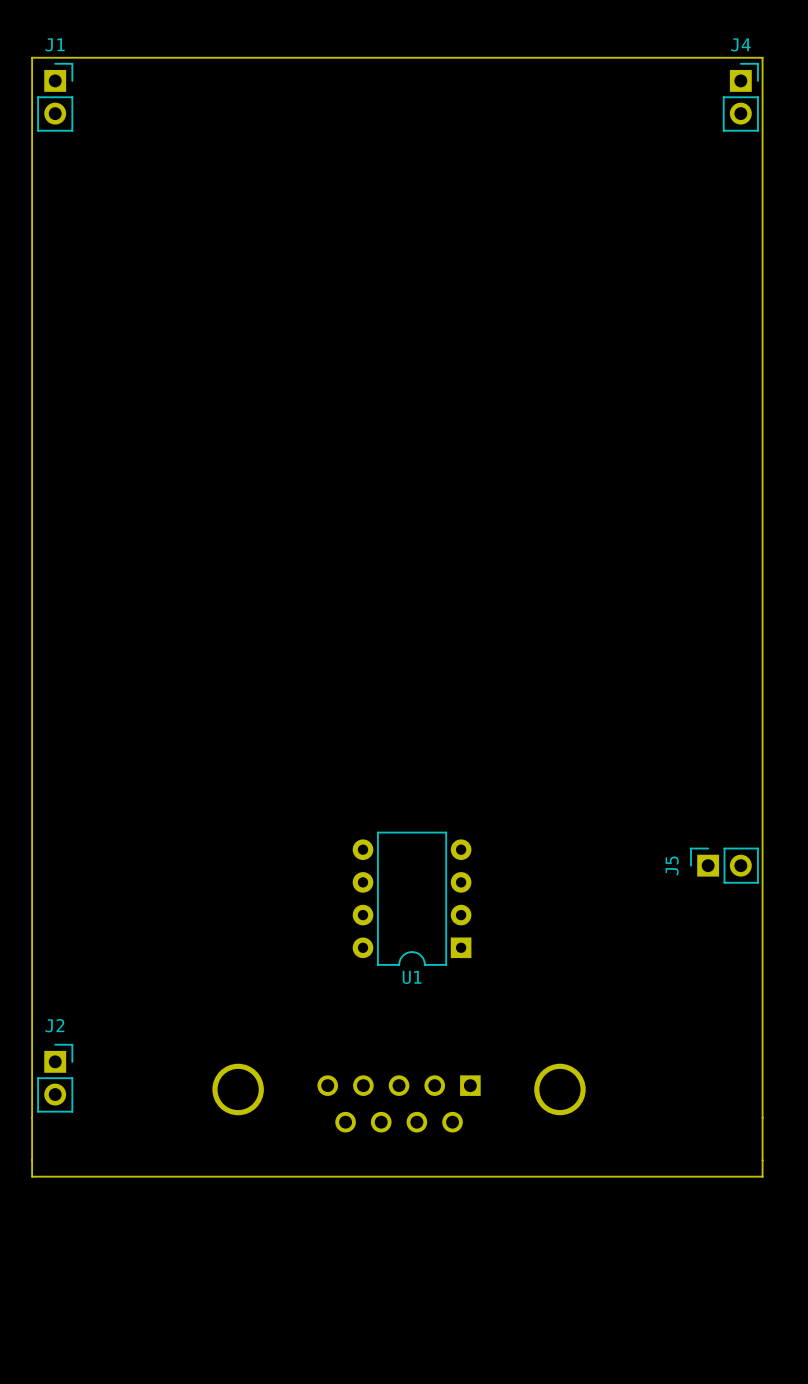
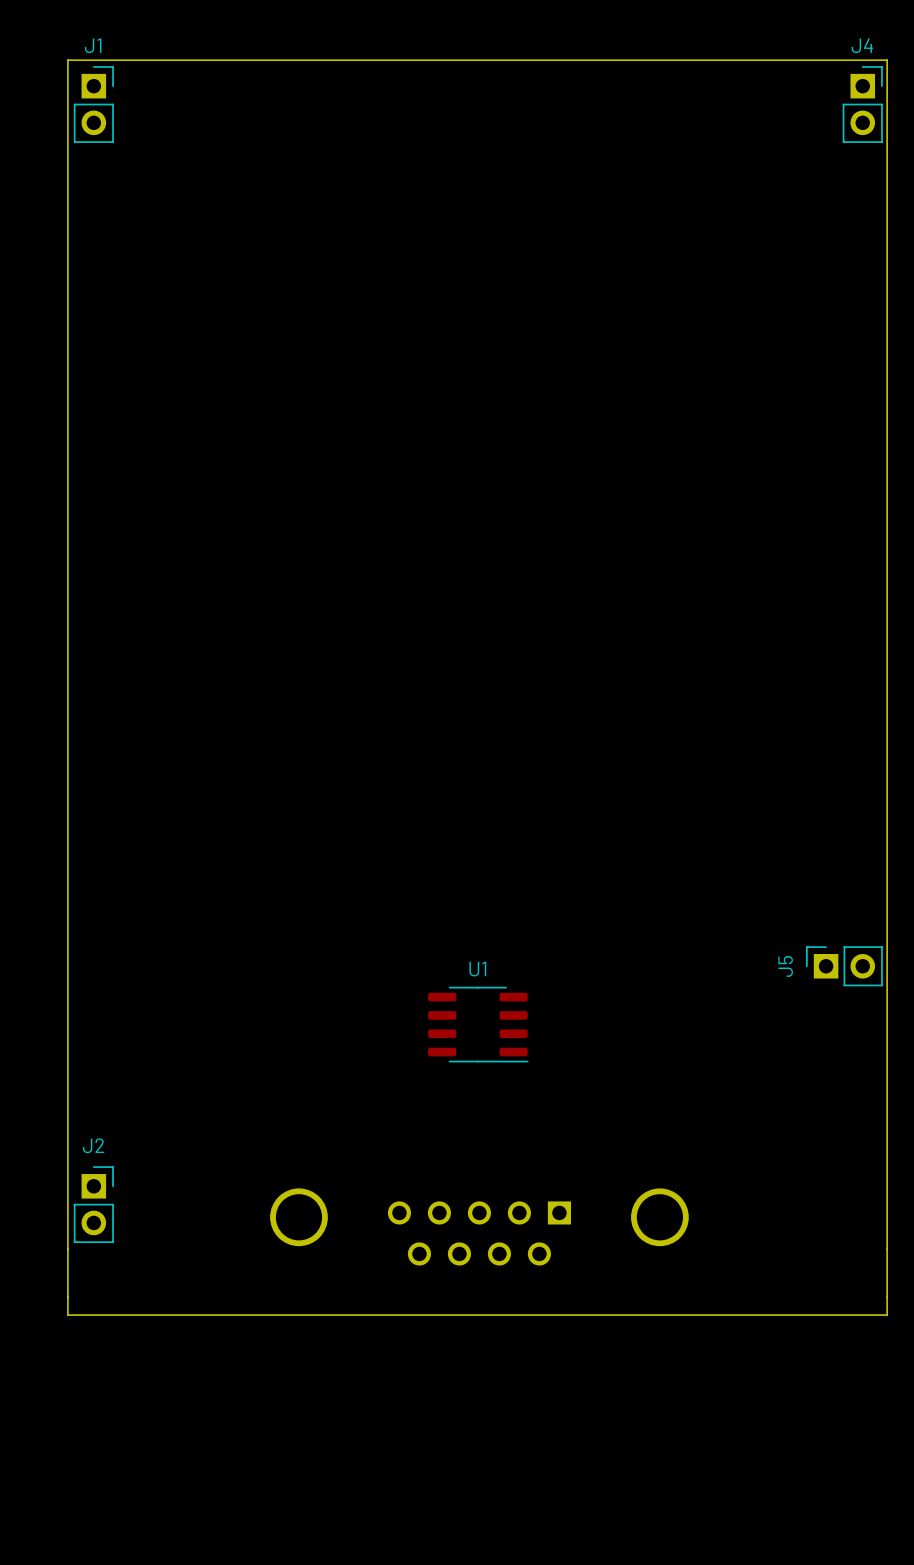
U1 footprint: [352, 831, 472, 966] -> [428, 986, 529, 1063]
U1 name position: U1 (412, 977) -> U1 (477, 969)

